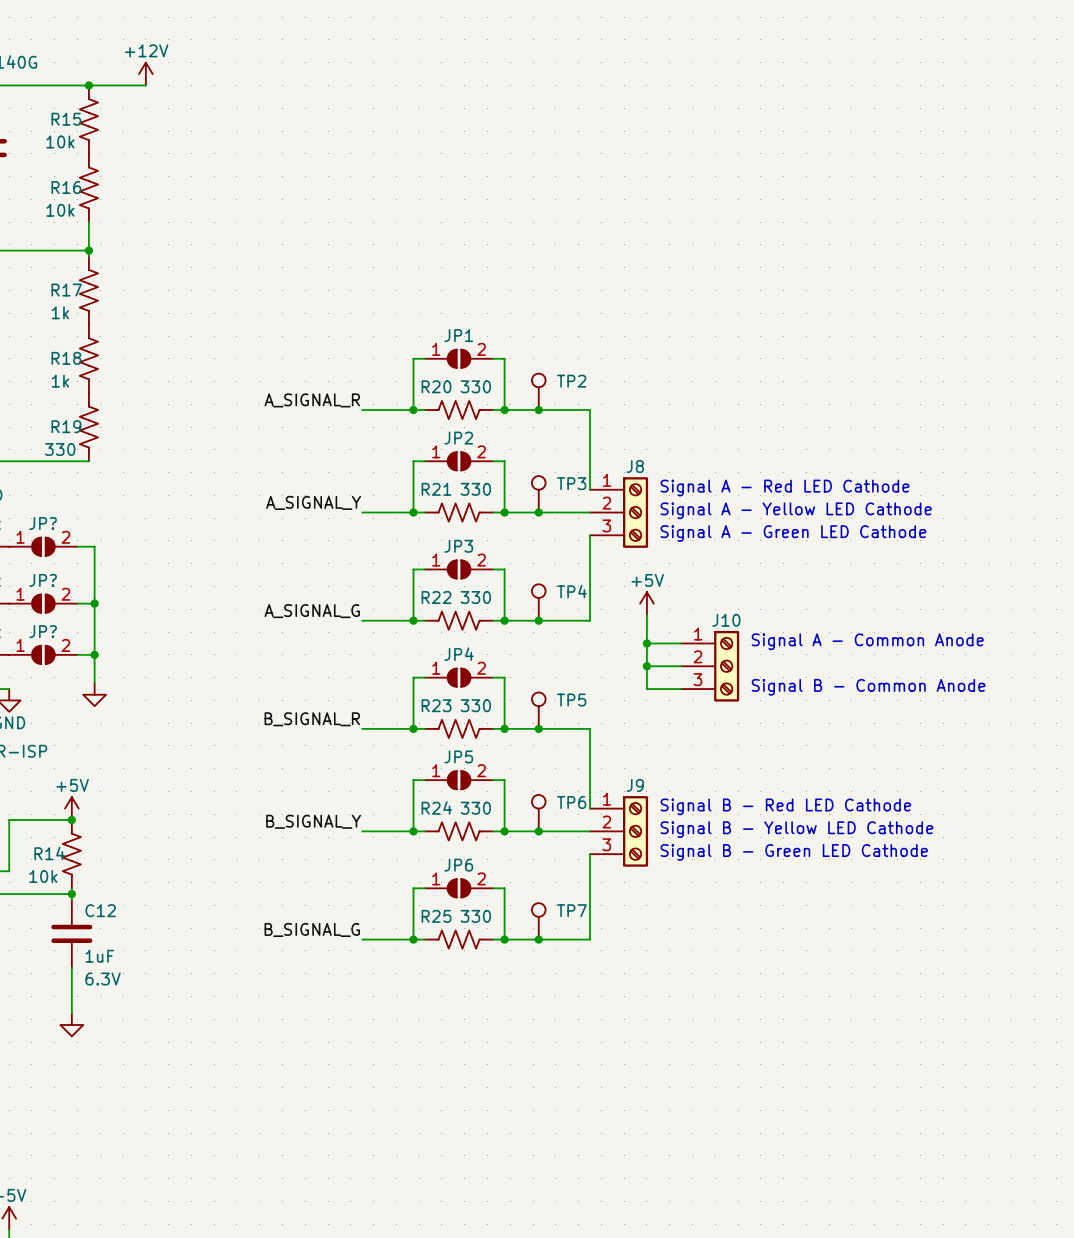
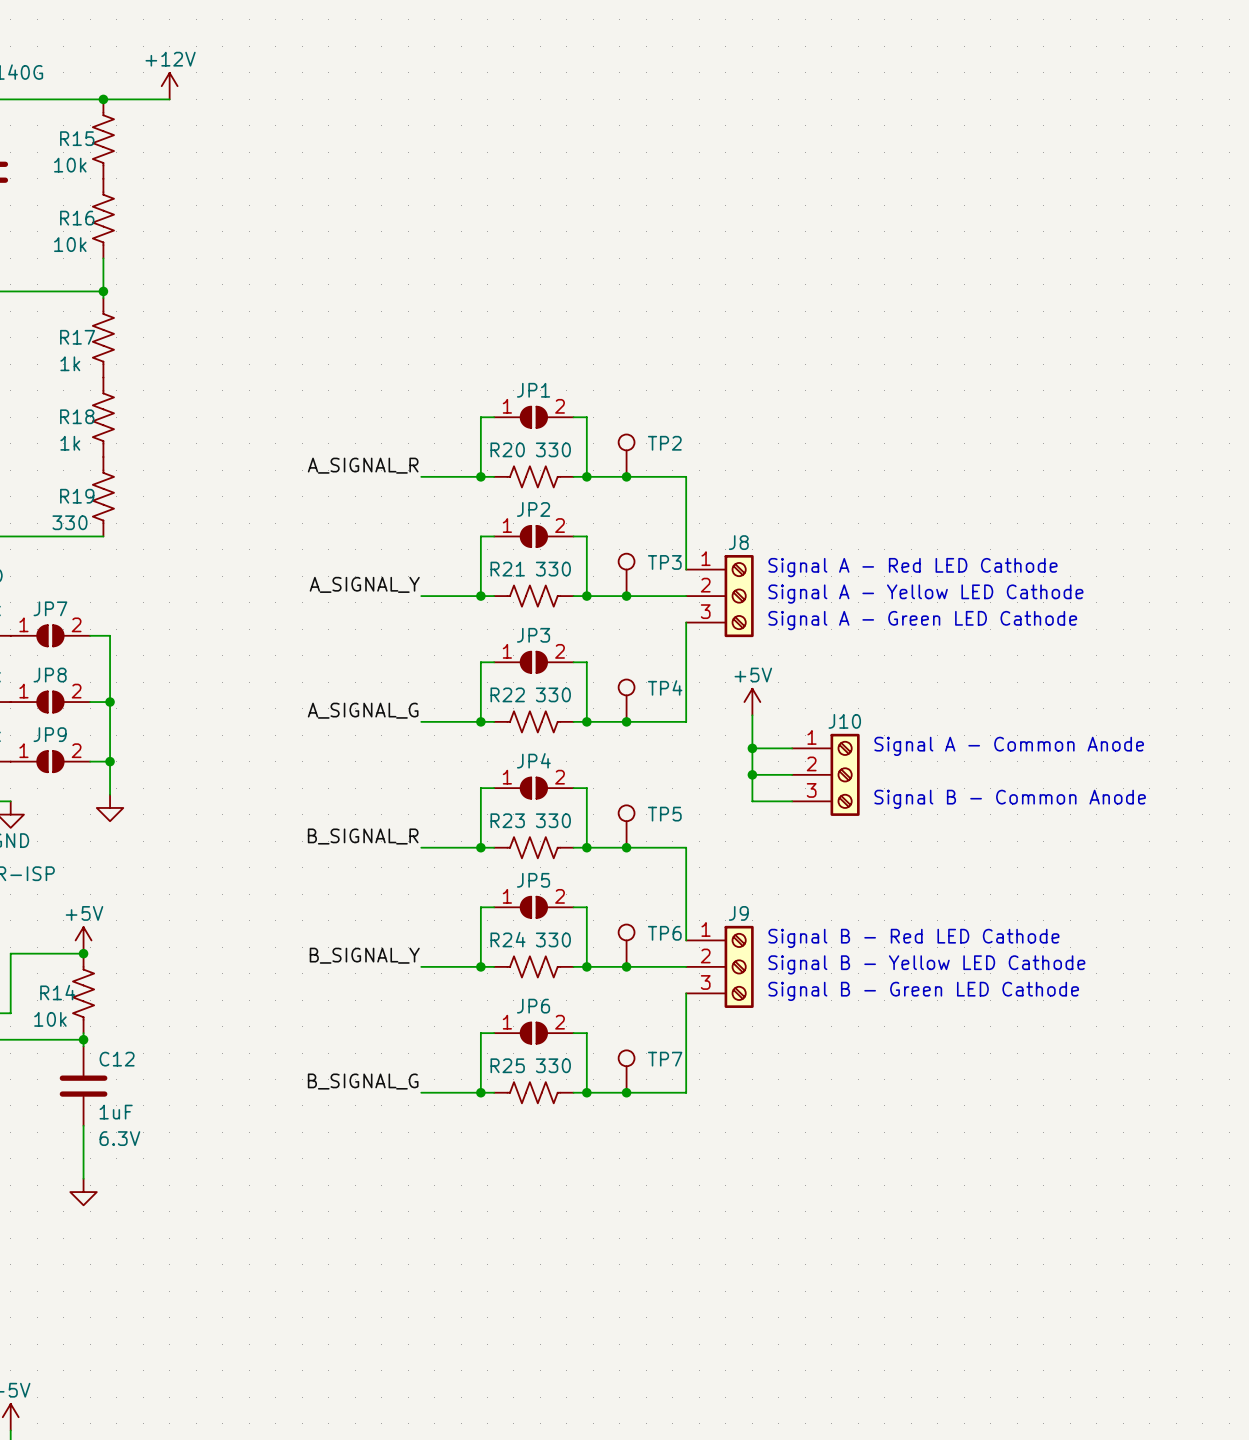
JP? name: JP? (43, 523) -> JP7 (50, 608)
JP? name: JP? (43, 580) -> JP8 (50, 675)
JP? name: JP? (43, 631) -> JP9 (50, 734)

